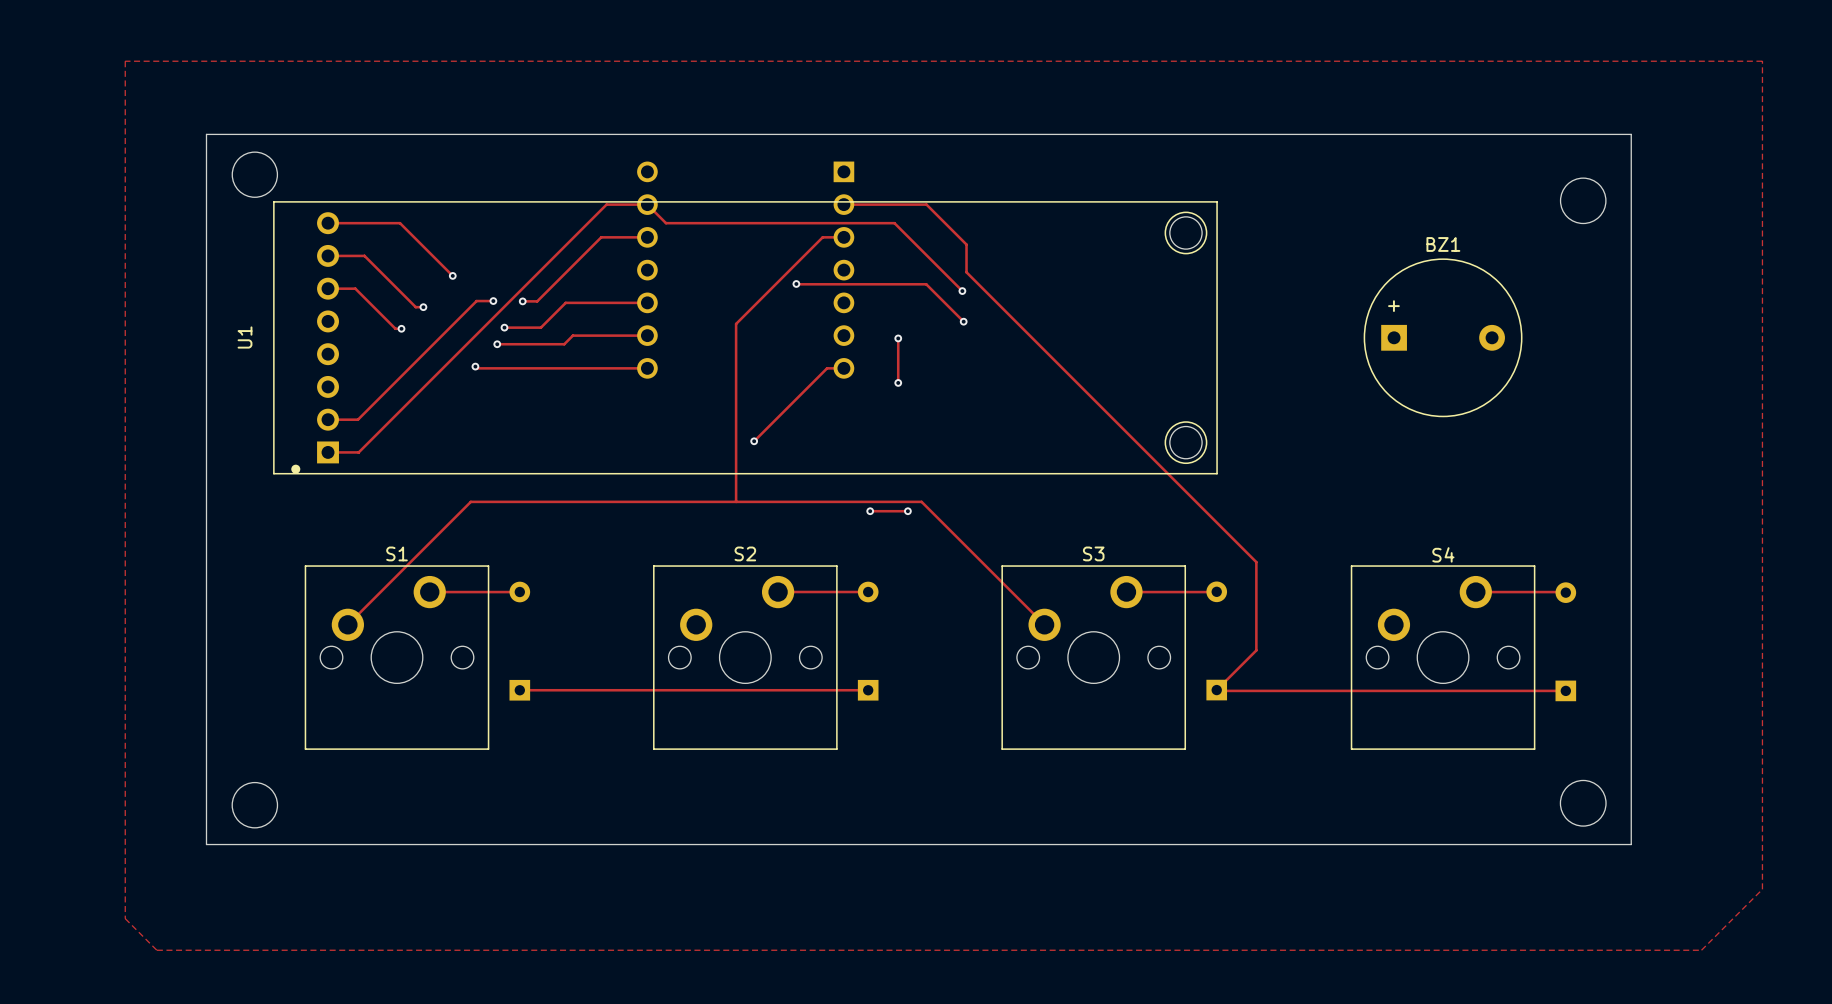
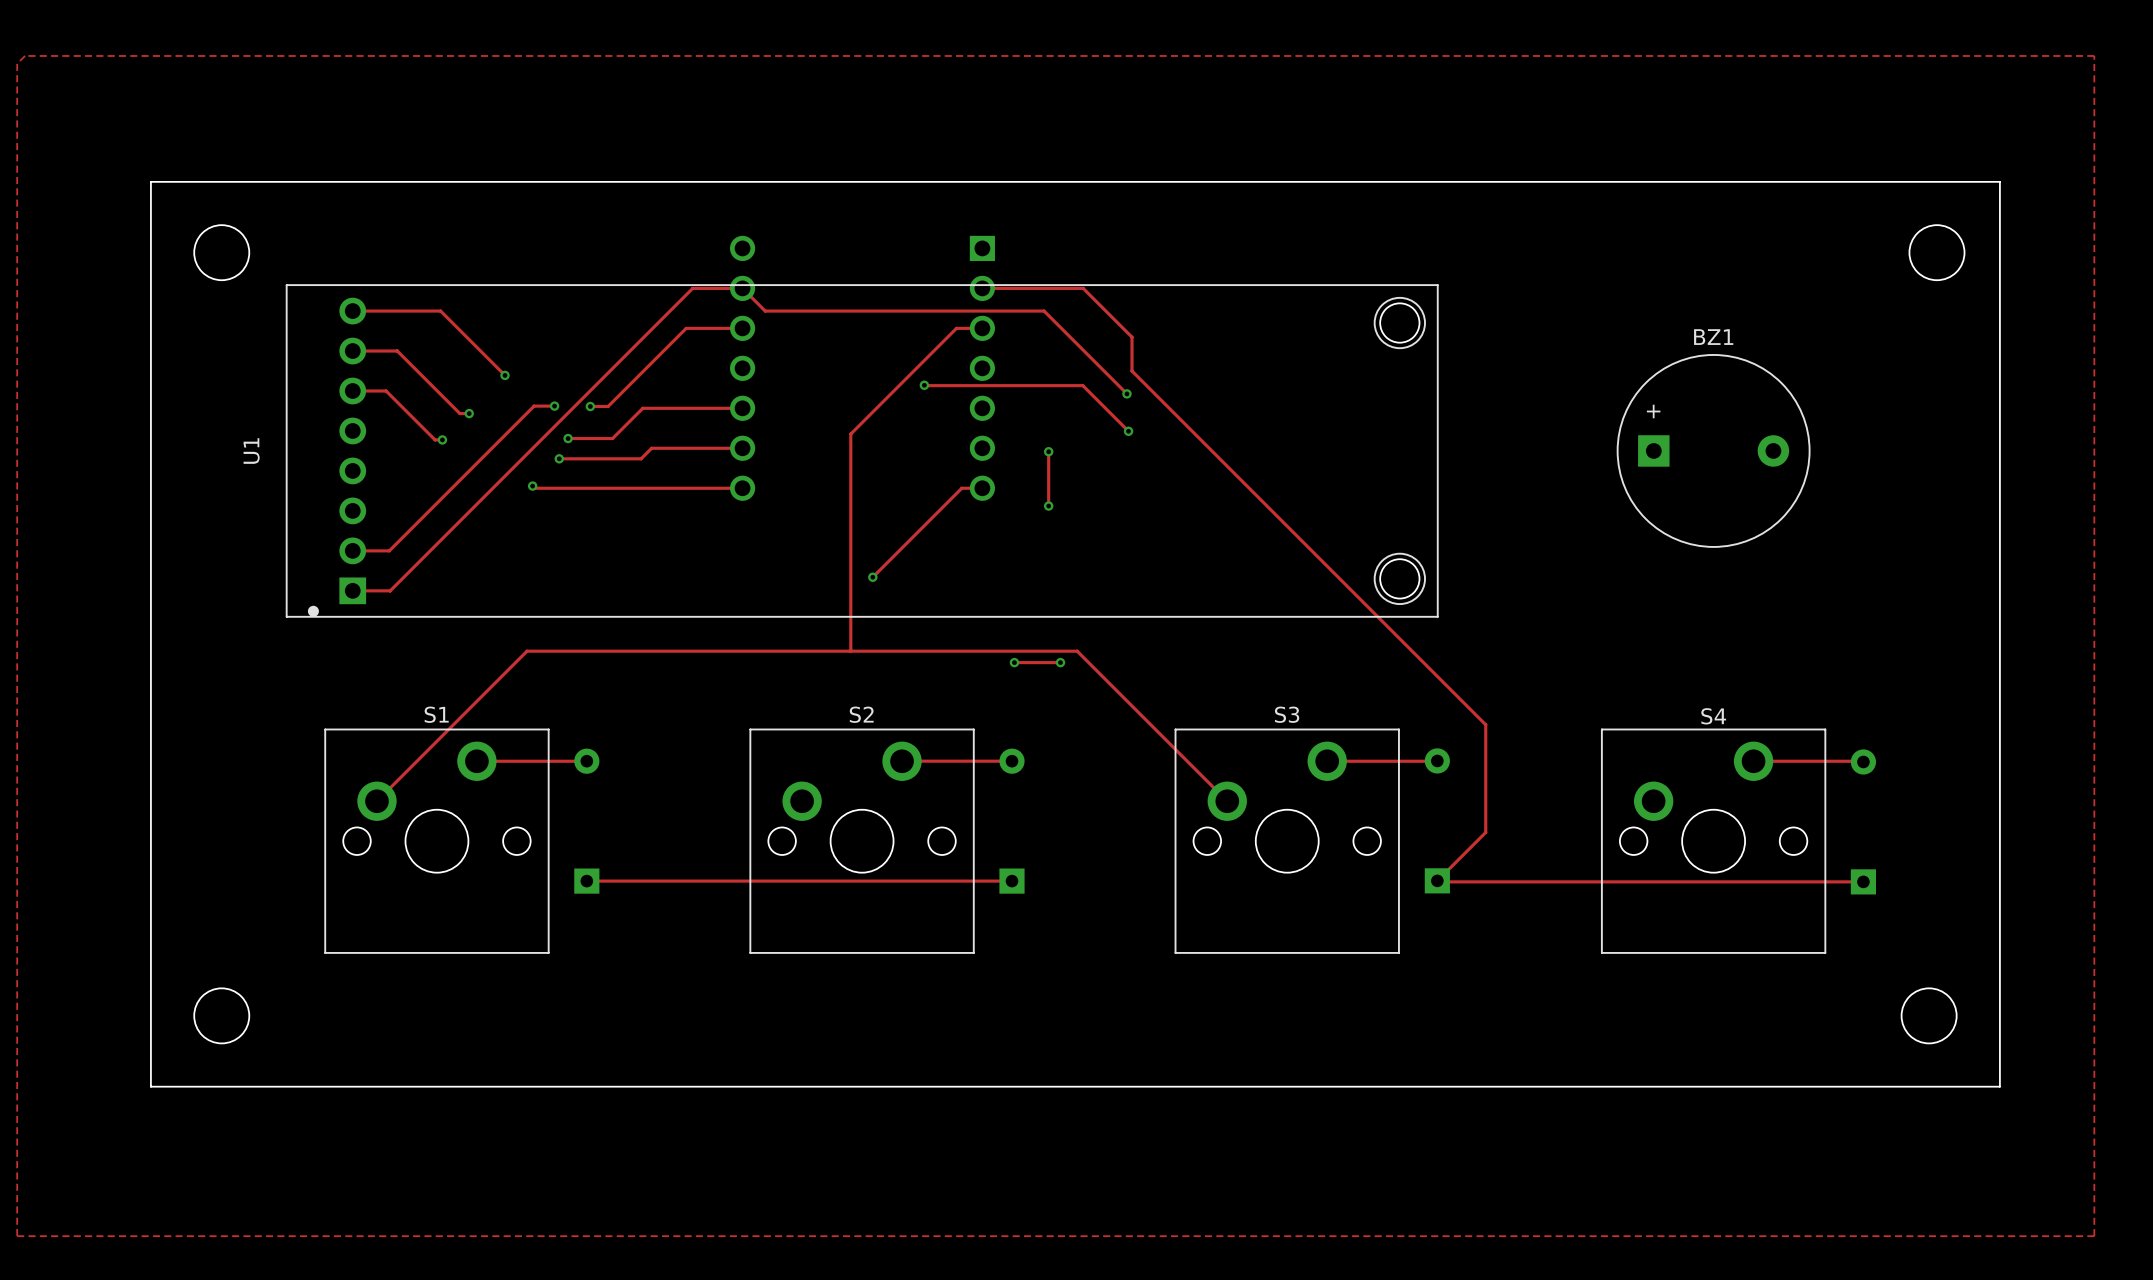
zone outline: (125, 61) (1762, 61) (1762, 889) (1701, 950) (156, 950) (125, 918) (125, 61) -> (25, 55) (17, 63) (17, 1236) (2094, 1236) (2094, 55) (25, 55)
board edge: (206, 134) (1631, 134) (1631, 844) (206, 844) (206, 134) -> (150, 181) (150, 1086) (1999, 1086) (1999, 181) (150, 181)
round board edge: none -> [1909, 224, 1965, 281]
round board edge position: (254, 174) -> (221, 252)
round board edge: [1560, 177, 1607, 224] -> none
round board edge: none -> [193, 987, 250, 1044]
round board edge: none -> [1901, 987, 1958, 1044]
round board edge: [1560, 780, 1607, 827] -> none
round board edge: [231, 782, 278, 829] -> none

